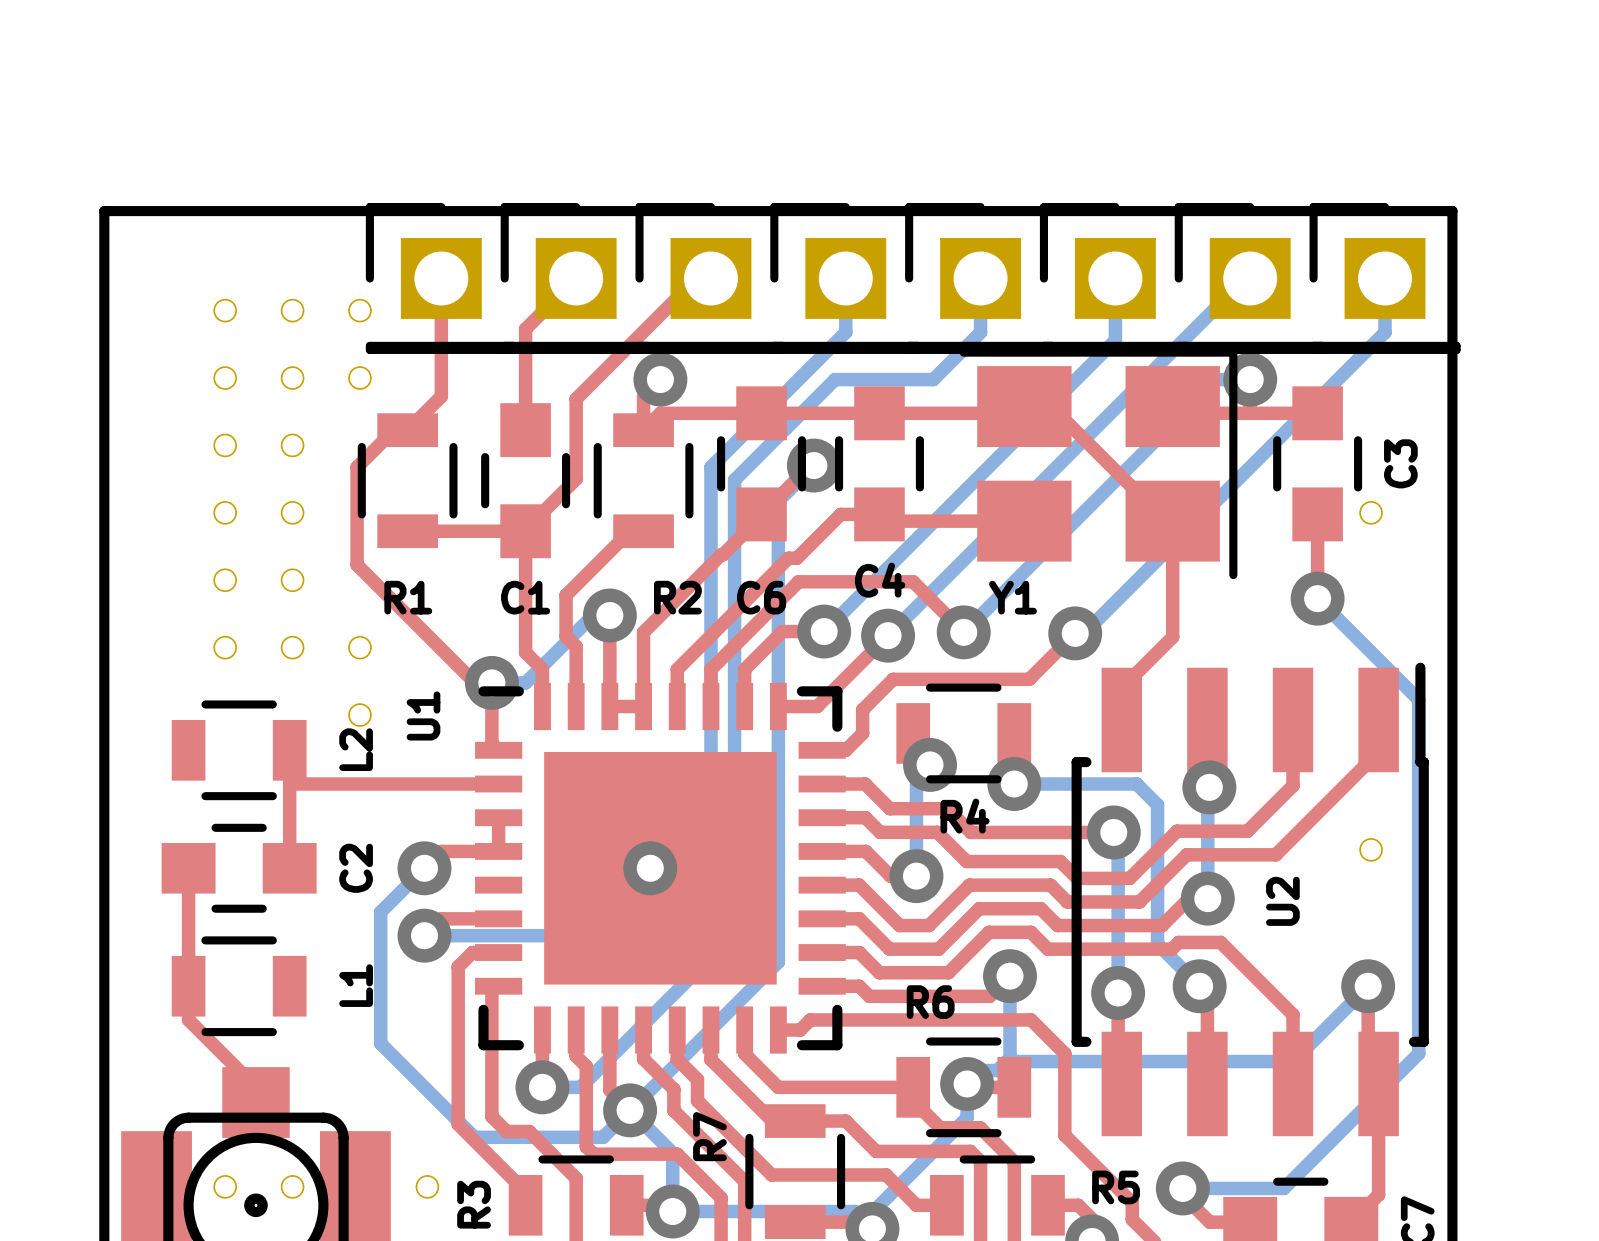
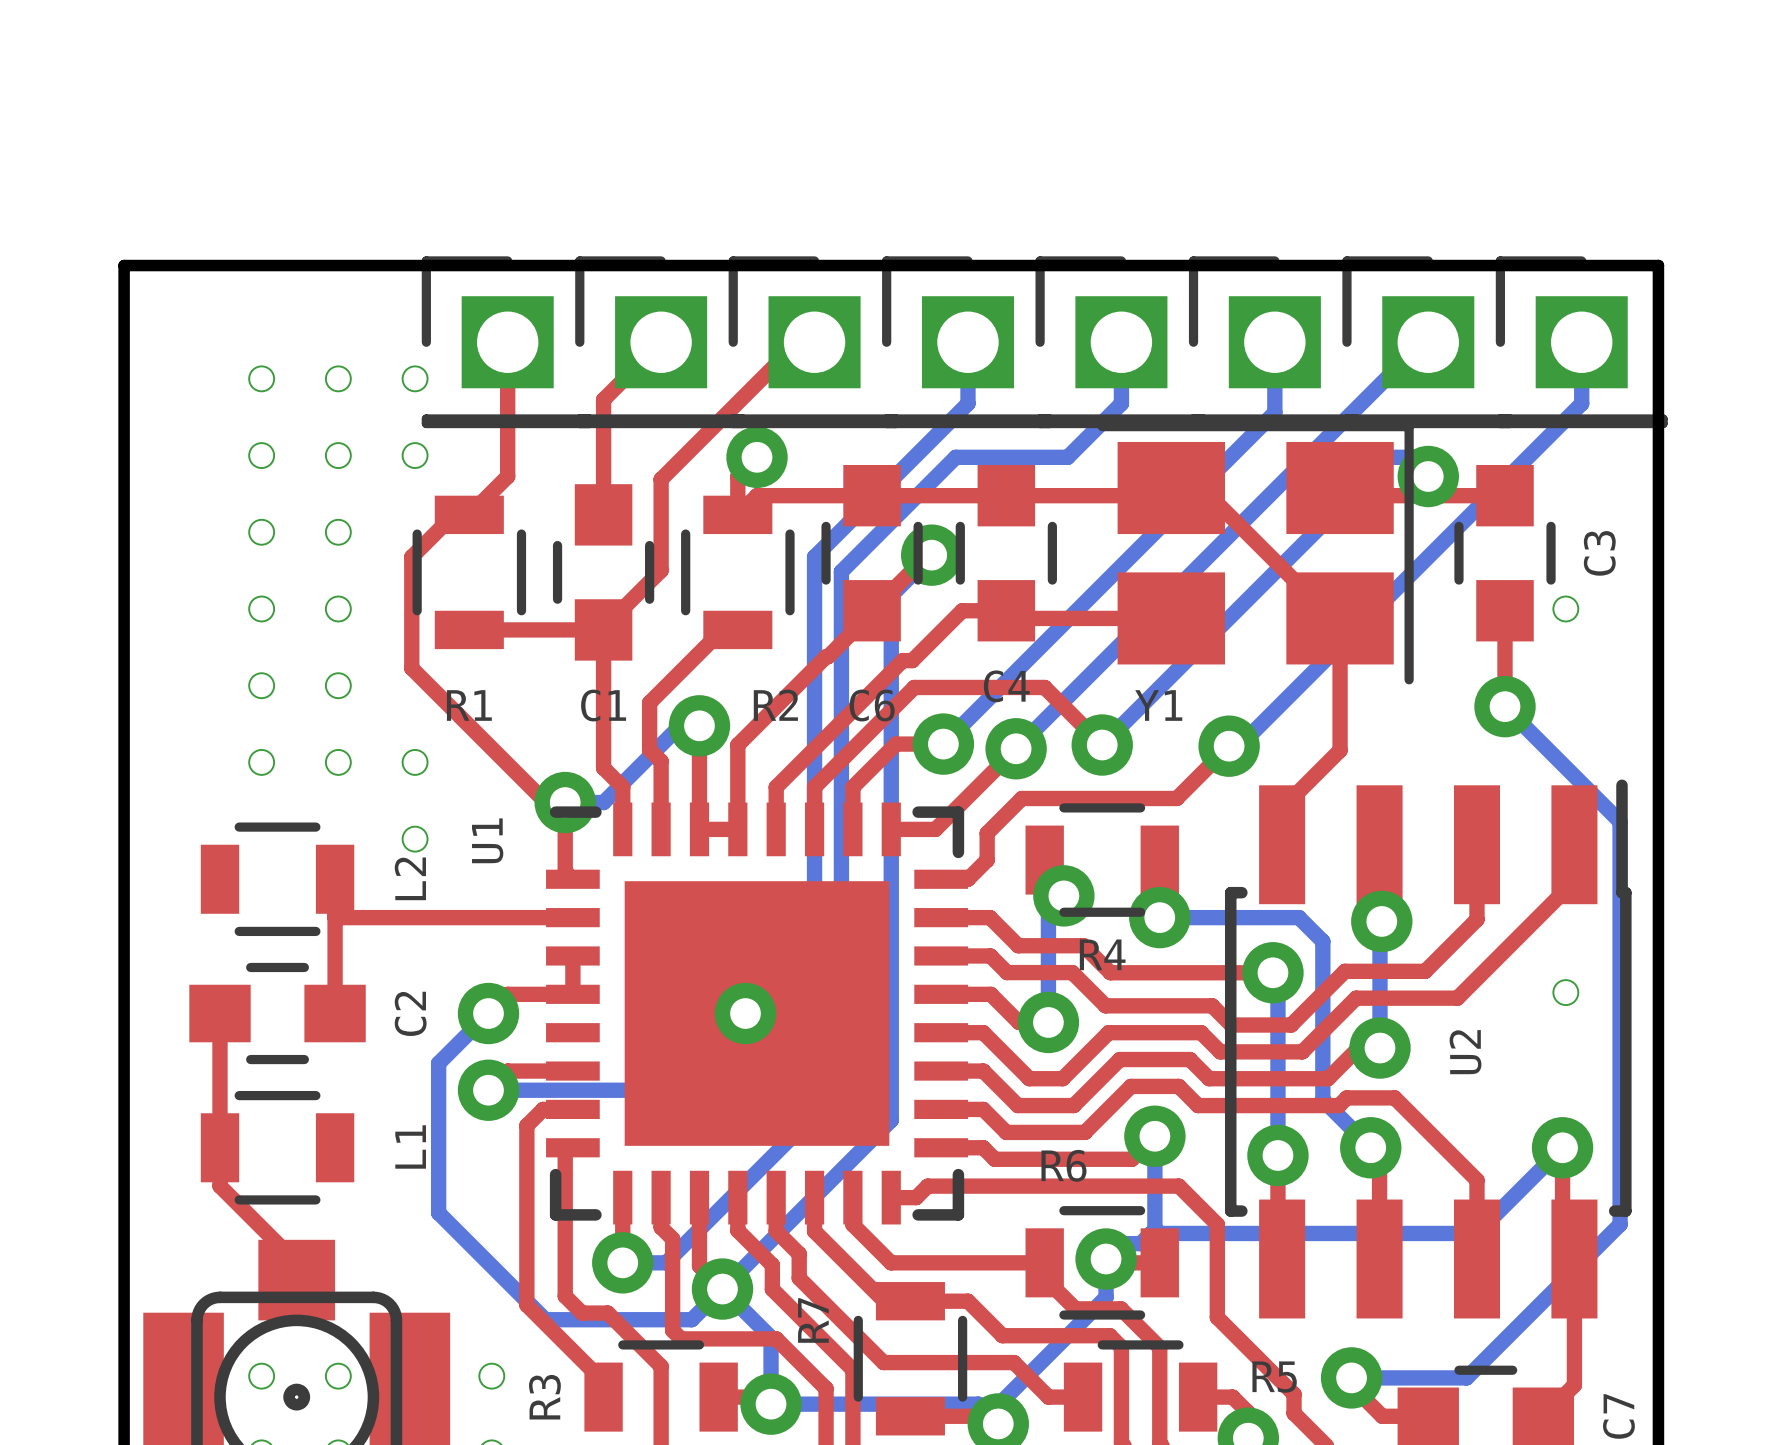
via position: (1250, 379) -> (1428, 476)

